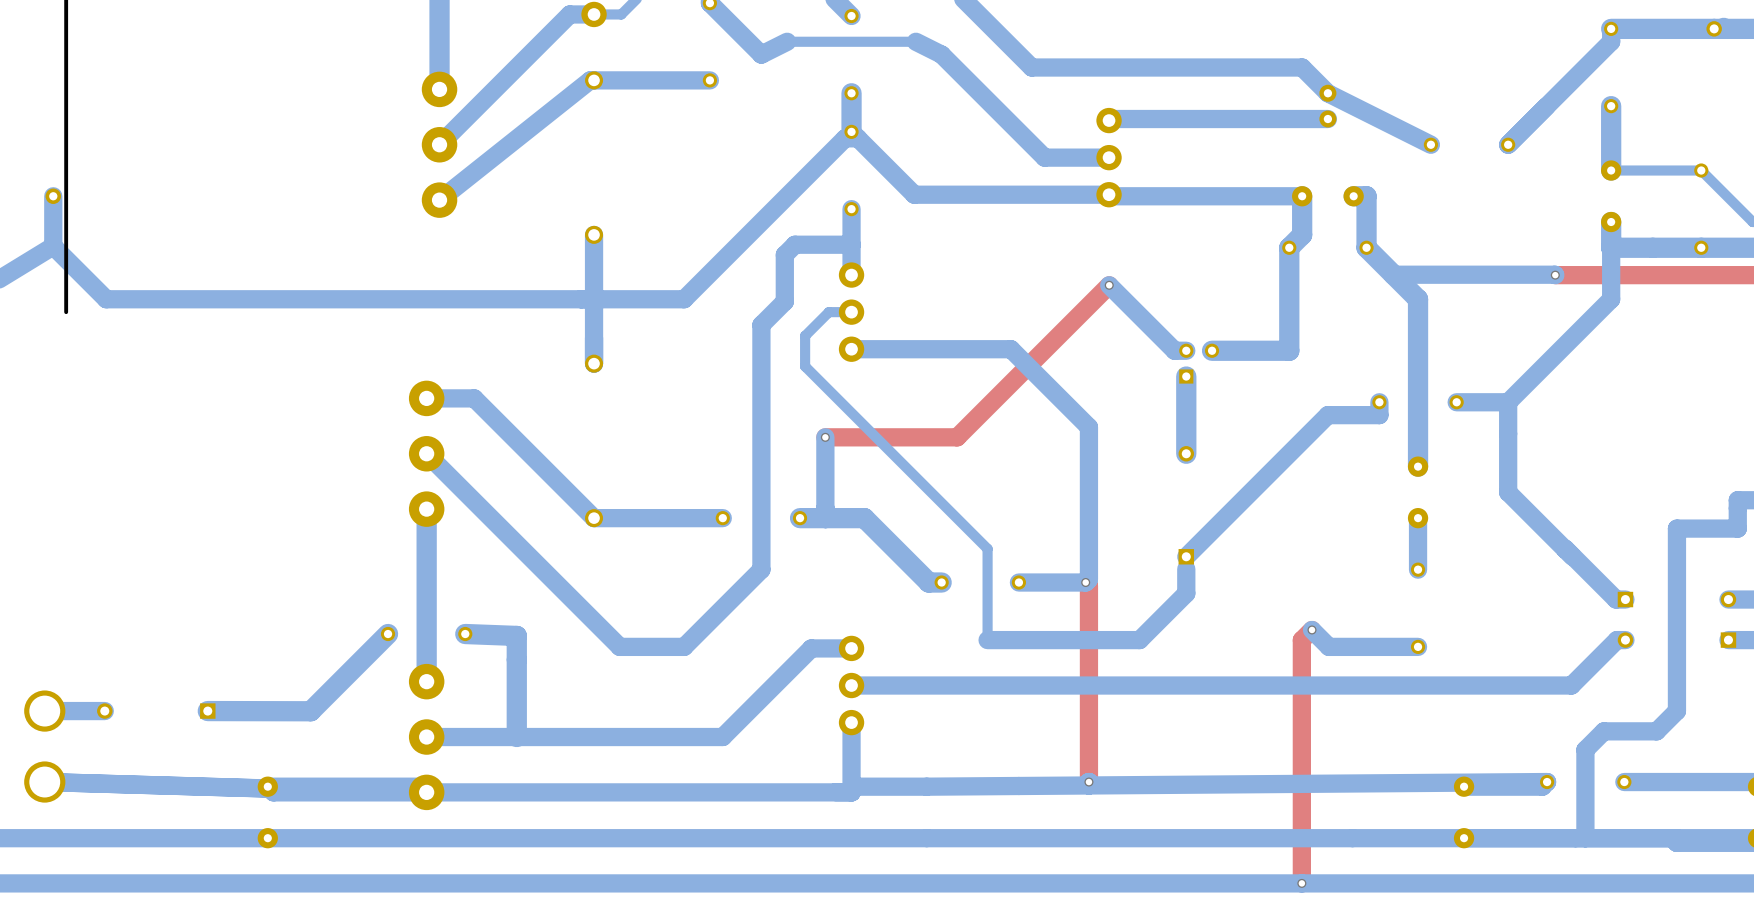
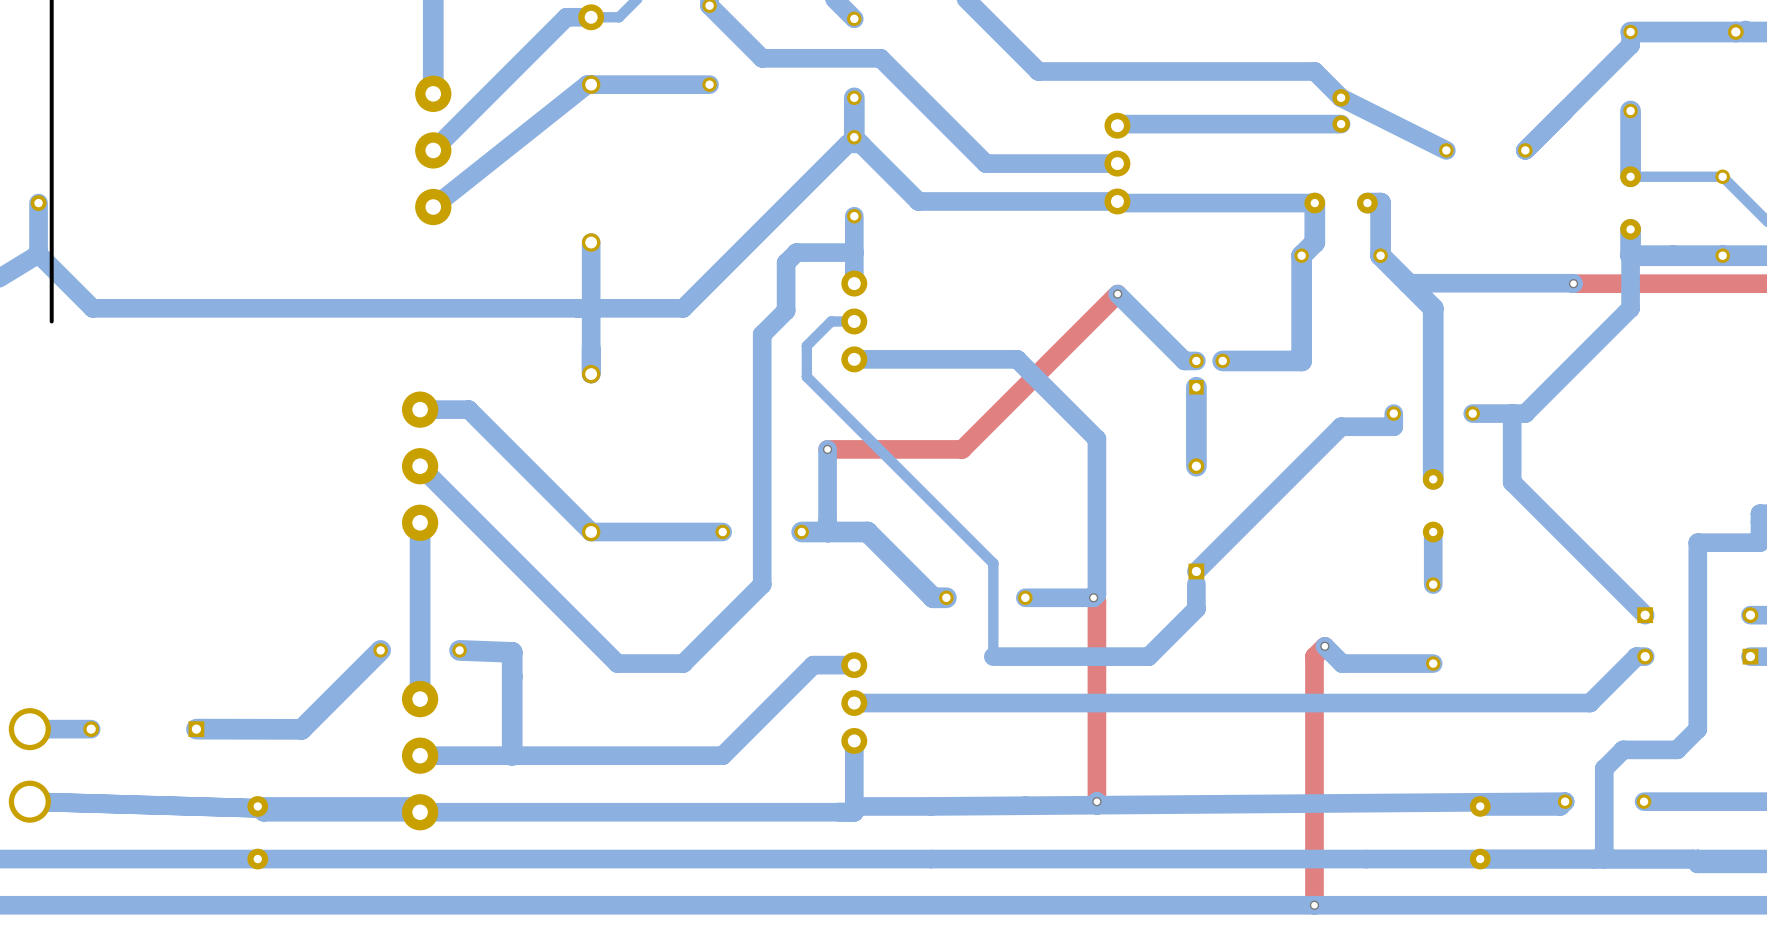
bottom track: (761, 54) (787, 41) (915, 41) (941, 54) (1044, 157) -> (762, 58) (880, 58) (985, 163) (1051, 163)
bottom track: (1508, 402) (1508, 492) (1572, 556) -> none
bottom track: (1565, 549) (1616, 599) (1625, 599) -> (1512, 413) (1512, 482) (1645, 615)

